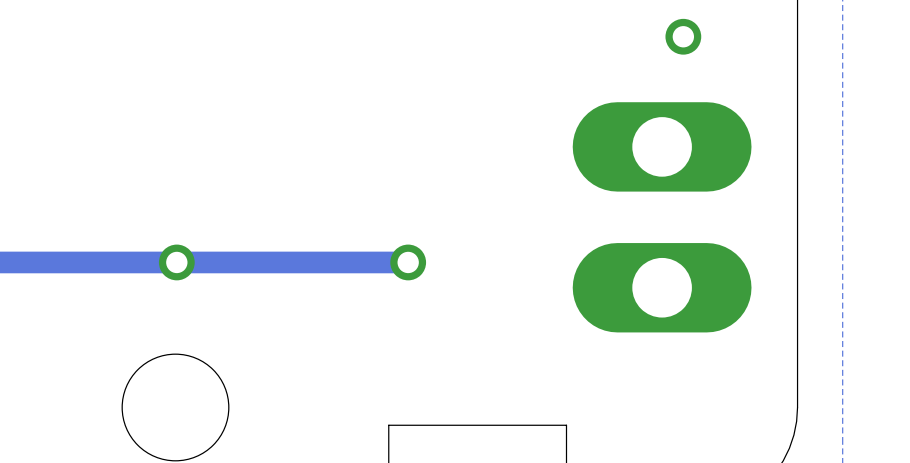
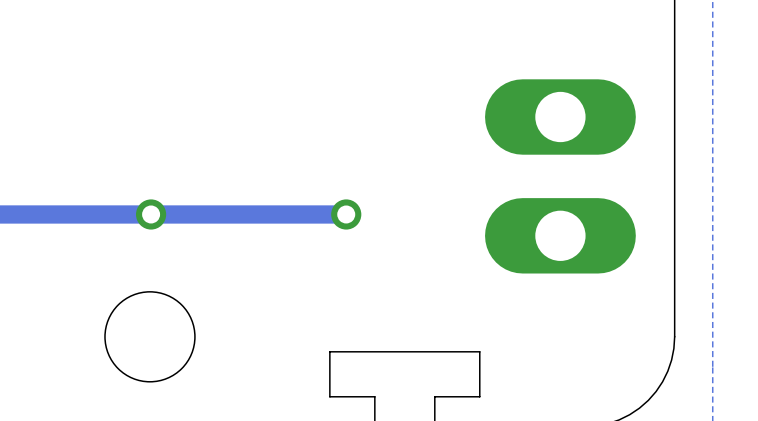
via: (683, 36) -> none

